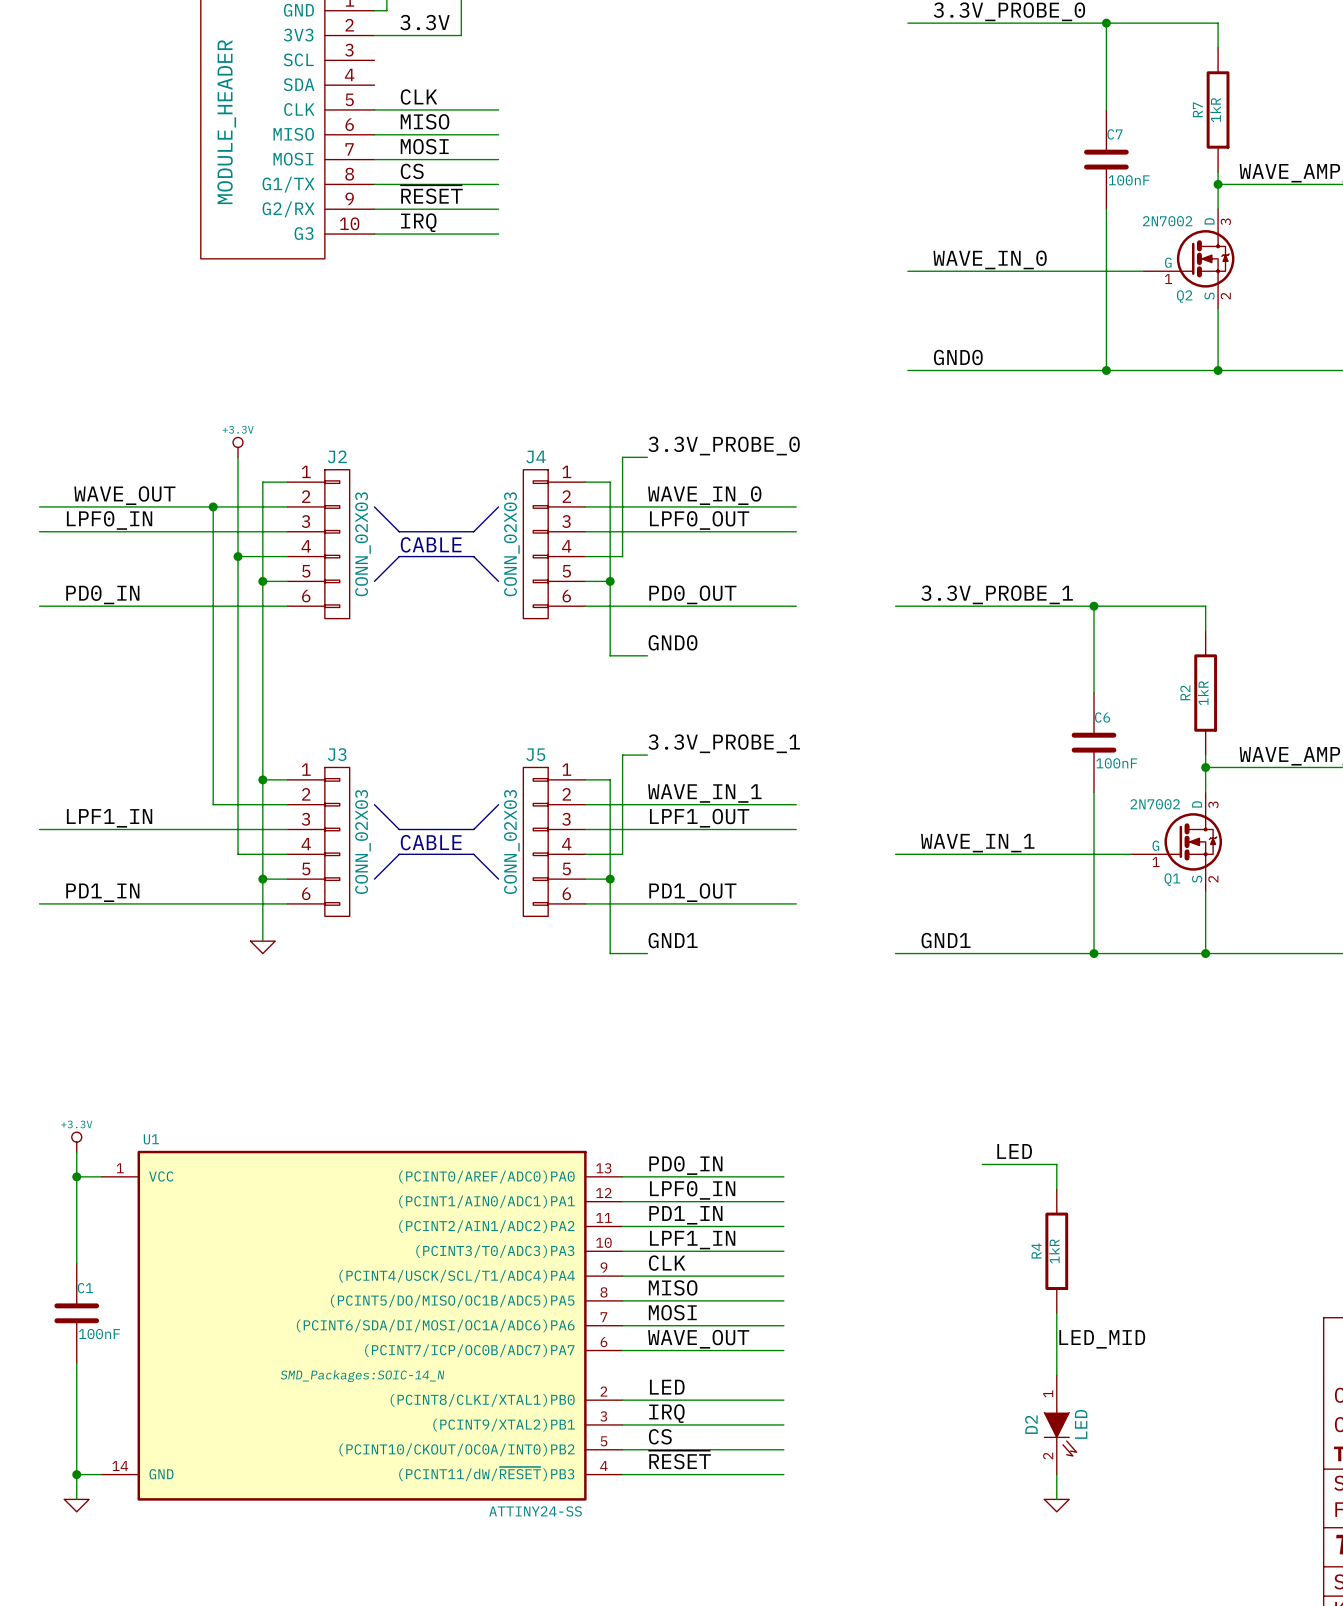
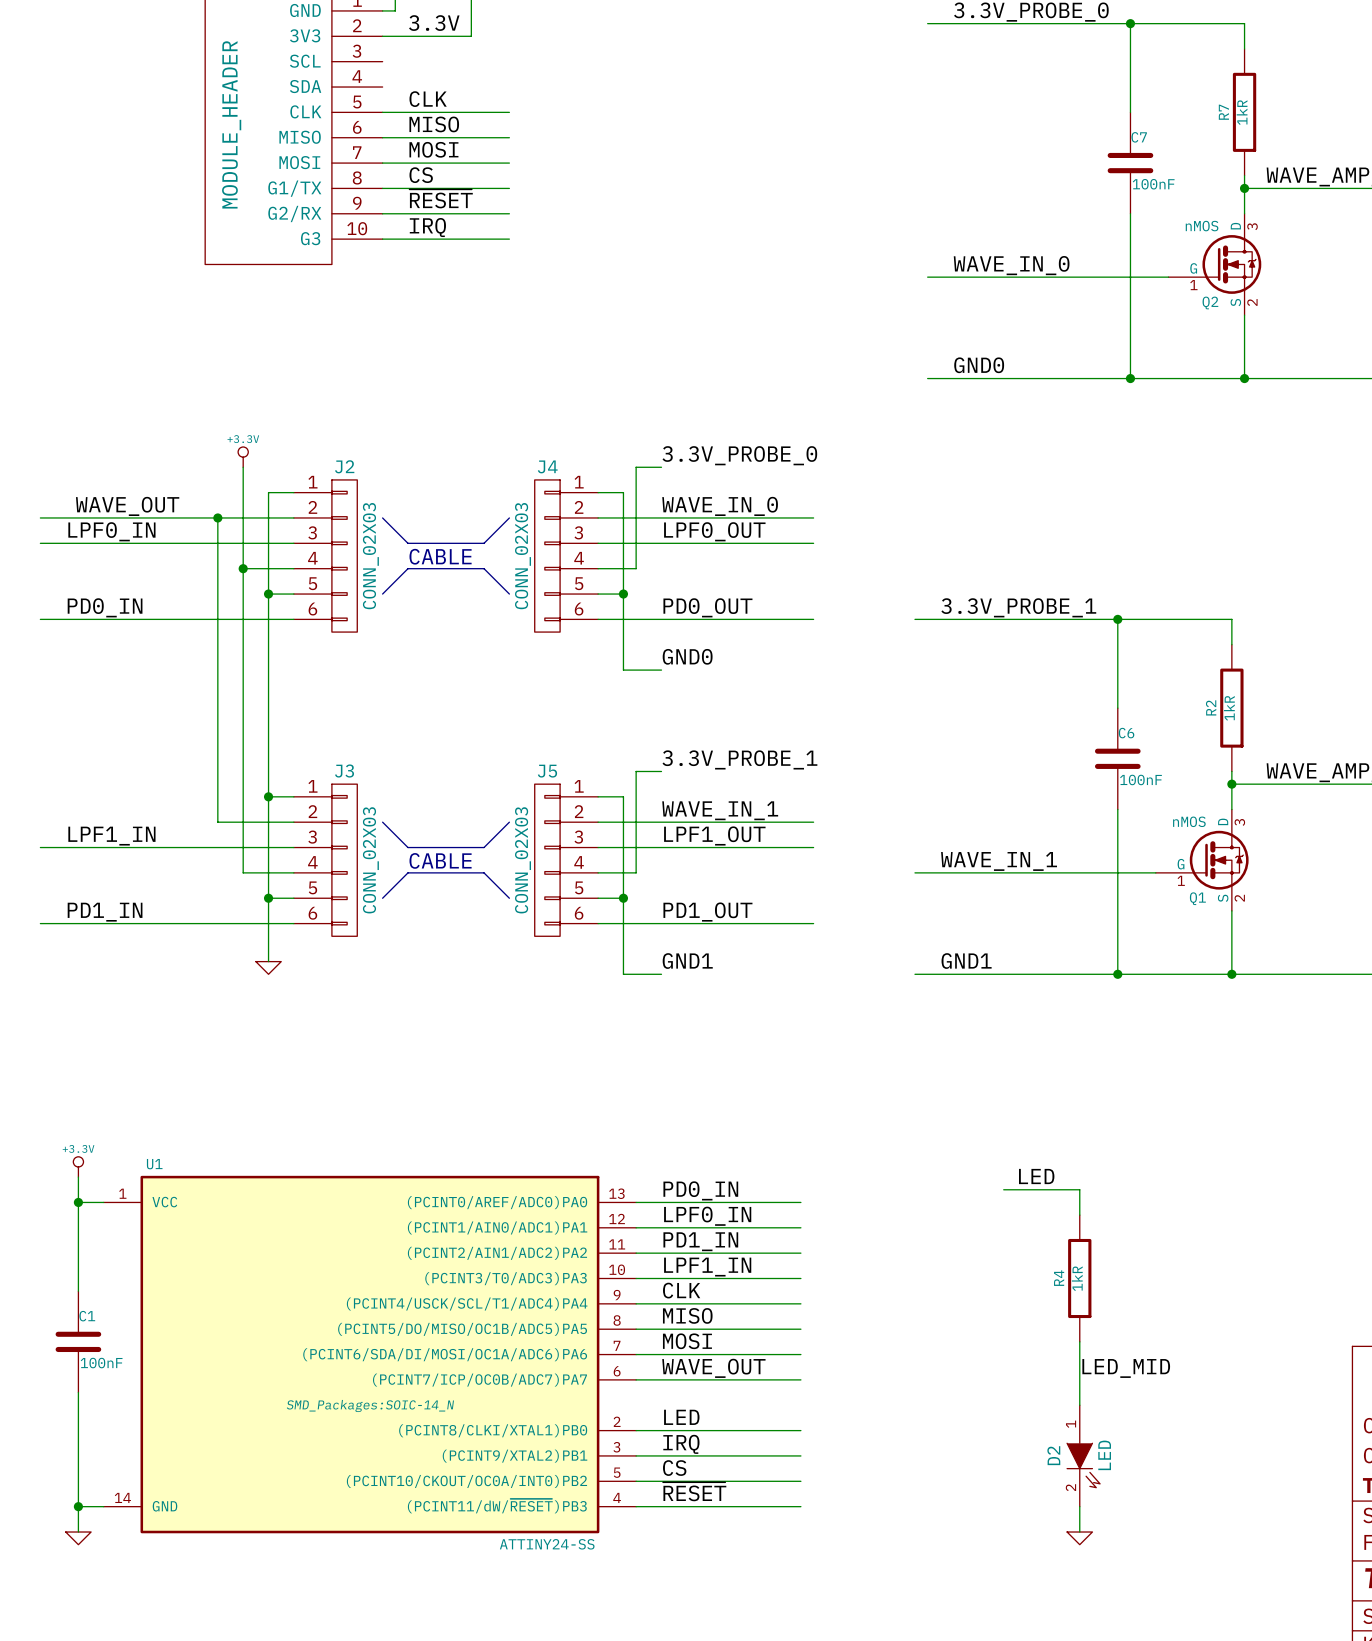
Q2 value: 2N7002 (1167, 221) -> nMOS (1202, 226)
Q1 value: 2N7002 (1155, 804) -> nMOS (1189, 821)

